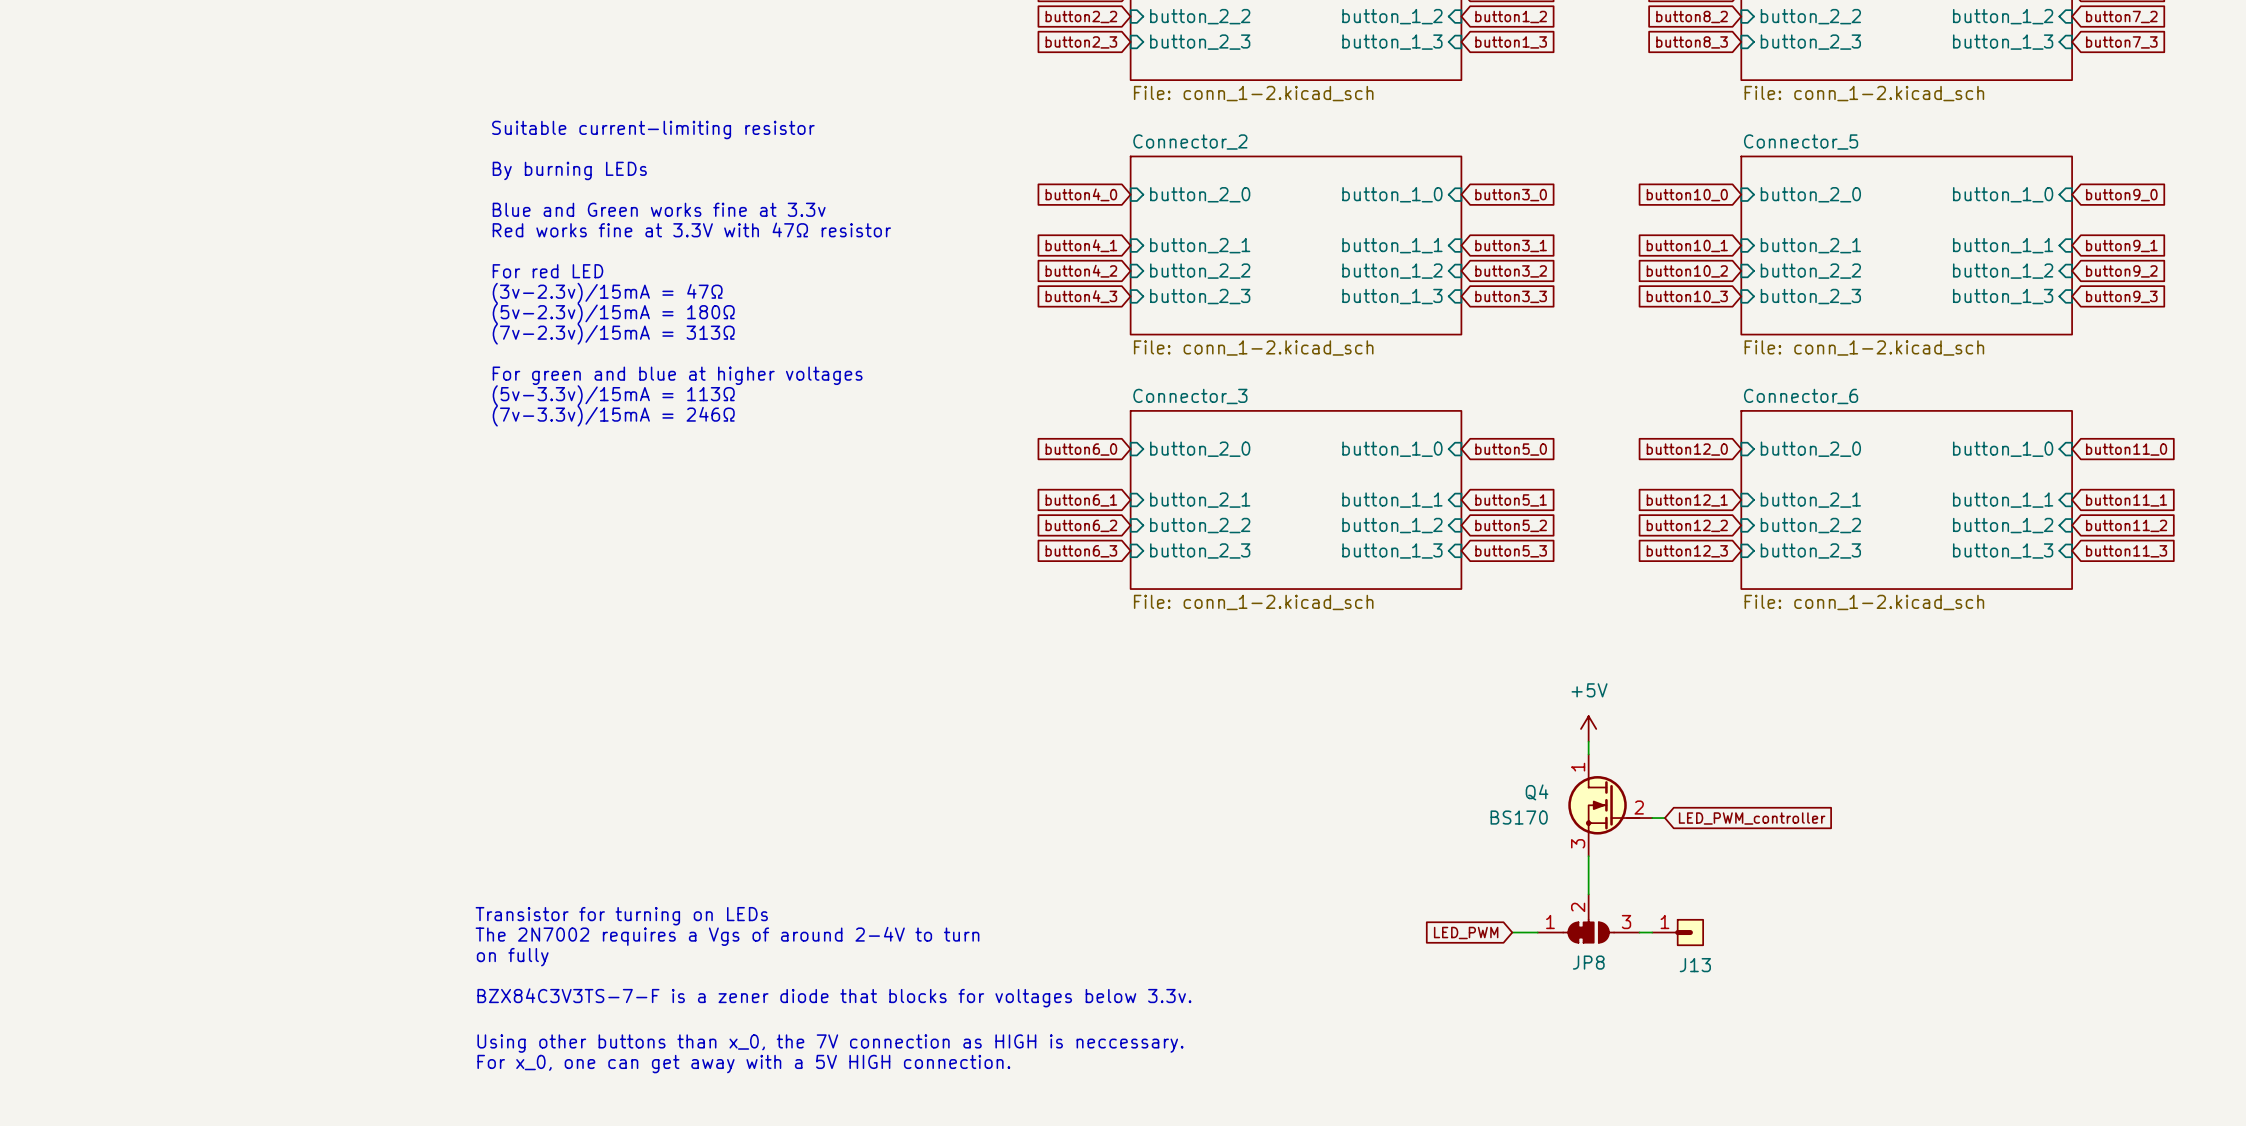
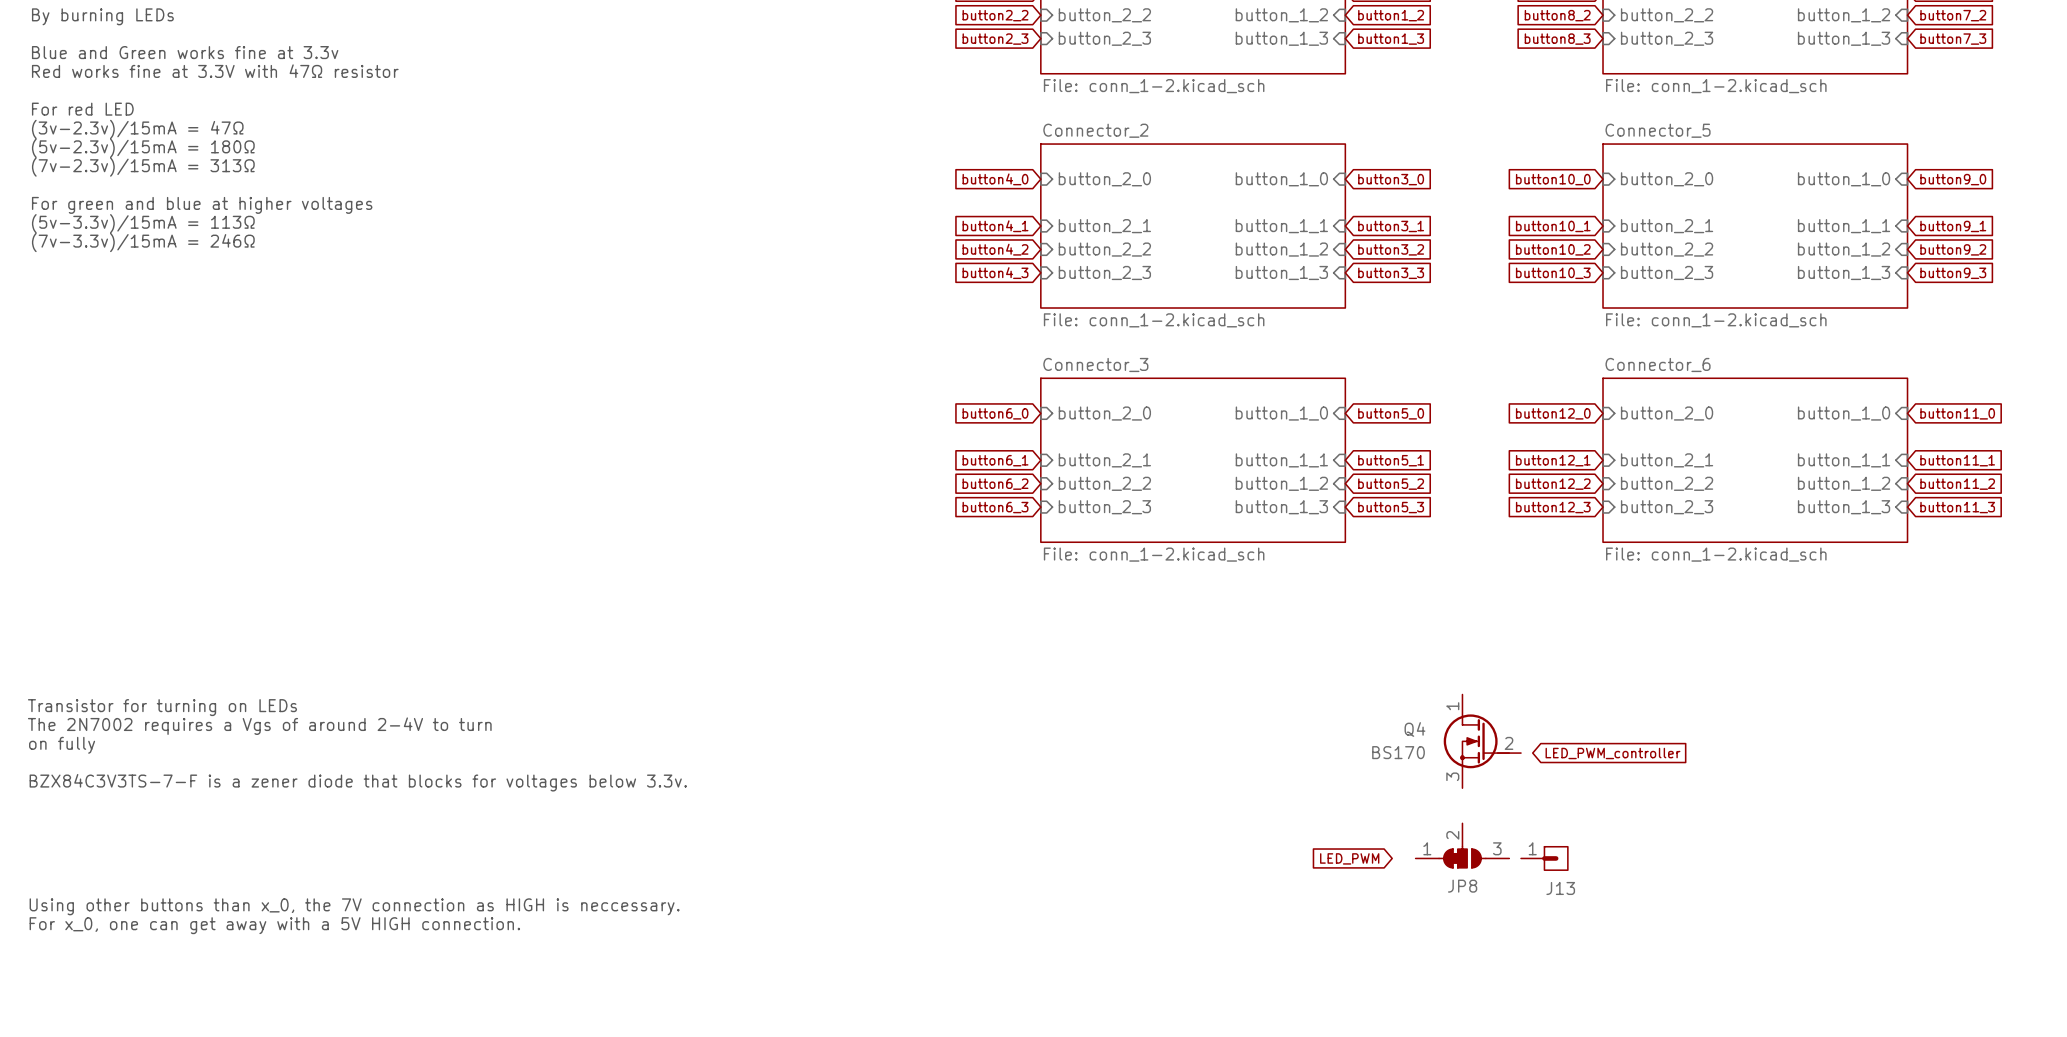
text: none -> By burning LEDs (102, 16)
text: none -> Blue and Green works fine at 3.3v (185, 52)
text: none -> Red works fine at 3.3V with 47Ω resistor (215, 71)
text: none -> For red LED (82, 109)
text: Suitable current-limiting resistor (653, 129) -> none
text: none -> (3v-2.3v)/15mA = 47Ω (137, 129)
text: none -> (5v-2.3v)/15mA = 180Ω (143, 148)
text: By burning LEDs (569, 170) -> none
text: none -> (7v-2.3v)/15mA = 313Ω (143, 167)
text: Blue and Green works fine at 3.3v (659, 209) -> none
text: none -> For green and blue at higher voltages (202, 205)
text: Red works fine at 3.3V with 47Ω resistor (691, 229) -> none
text: none -> (5v-3.3v)/15mA = 113Ω (143, 223)
text: none -> (7v-3.3v)/15mA = 246Ω (143, 242)
text: For red LED (547, 271) -> none
text: (3v-2.3v)/15mA = 47Ω (607, 293) -> none
text: (5v-2.3v)/15mA = 180Ω (613, 313) -> none
text: (7v-2.3v)/15mA = 313Ω (613, 334) -> none
text: For green and blue at higher voltages (677, 375) -> none
text: (5v-3.3v)/15mA = 113Ω (613, 395) -> none
text: (7v-3.3v)/15mA = 246Ω (613, 416) -> none
power symbol: +5V (1588, 728) -> none
wire: (1588, 741) (1588, 754) -> none
text: none -> Transistor for turning on LEDs (162, 707)
text: none -> The 2N7002 requires a Vgs of around 2-4V to turn (259, 726)
text: none -> on fully (62, 745)
wire: (1652, 818) (1664, 818) -> none
text: none -> BZX84C3V3TS-7-F is a zener diode that blocks for voltages below 3.3v. (358, 782)
wire: (1588, 856) (1588, 894) -> none
text: Transistor for turning on LEDs (621, 916) -> none
wire: (1512, 932) (1537, 932) -> none
wire: (1639, 932) (1652, 932) -> none
text: The 2N7002 requires a Vgs of around 2-4V to turn (727, 936) -> none
text: on fully (512, 957) -> none
text: none -> Using other buttons than x_0, the 7V connection as HIGH is neccessary. (354, 906)
text: BZX84C3V3TS-7-F is a zener diode that blocks for voltages below 3.3v. (834, 997) -> none
text: none -> For x_0, one can get away with a 5V HIGH connection. (274, 925)
text: Using other buttons than x_0, the 7V connection as HIGH is neccessary. (830, 1043) -> none
text: For x_0, one can get away with a 5V HIGH connection. (743, 1064) -> none

